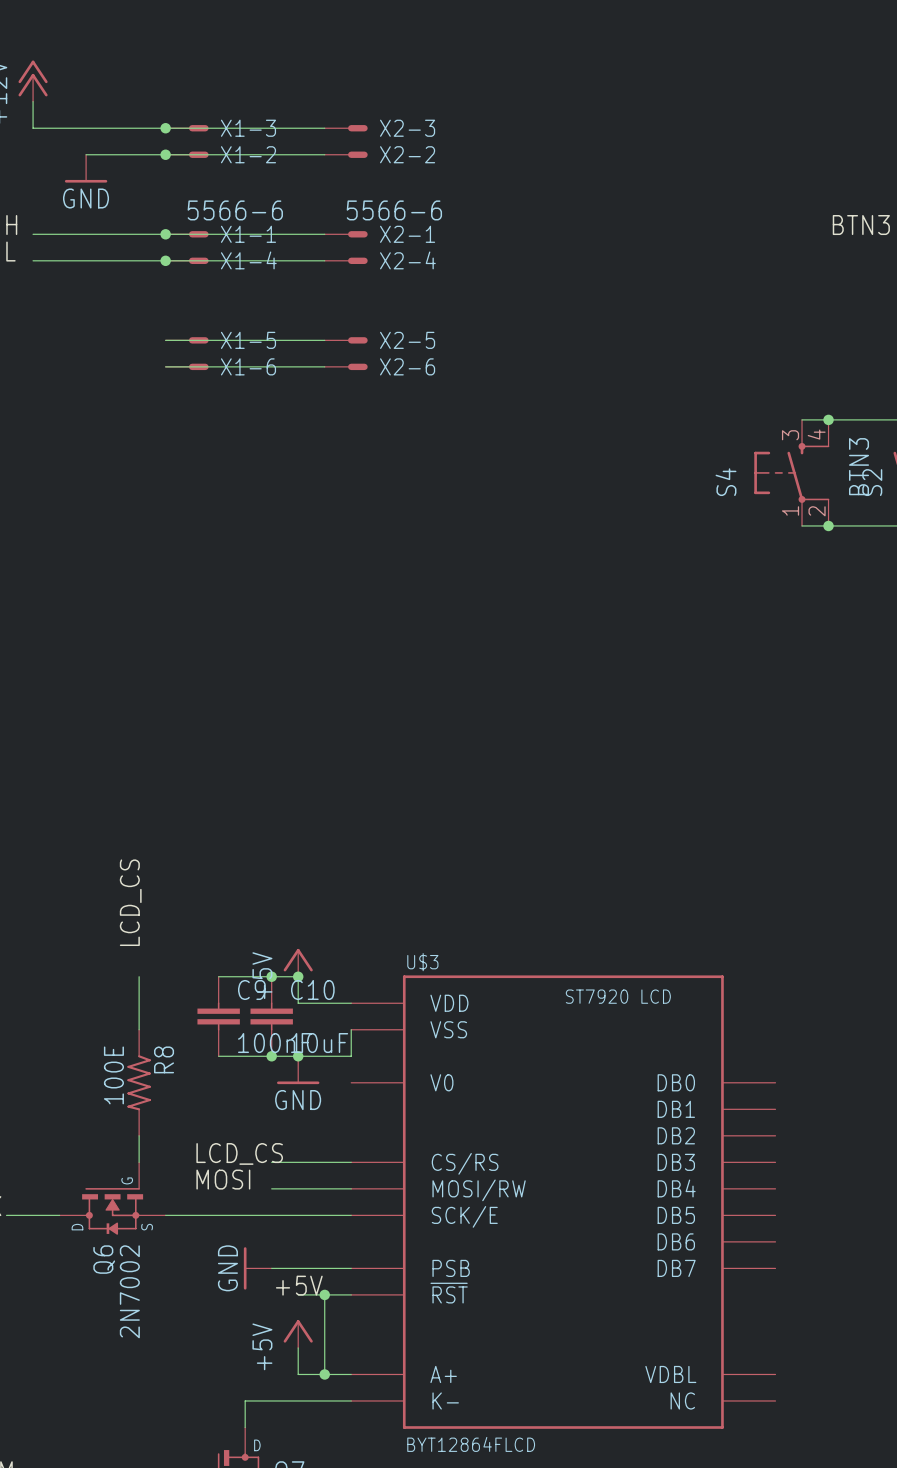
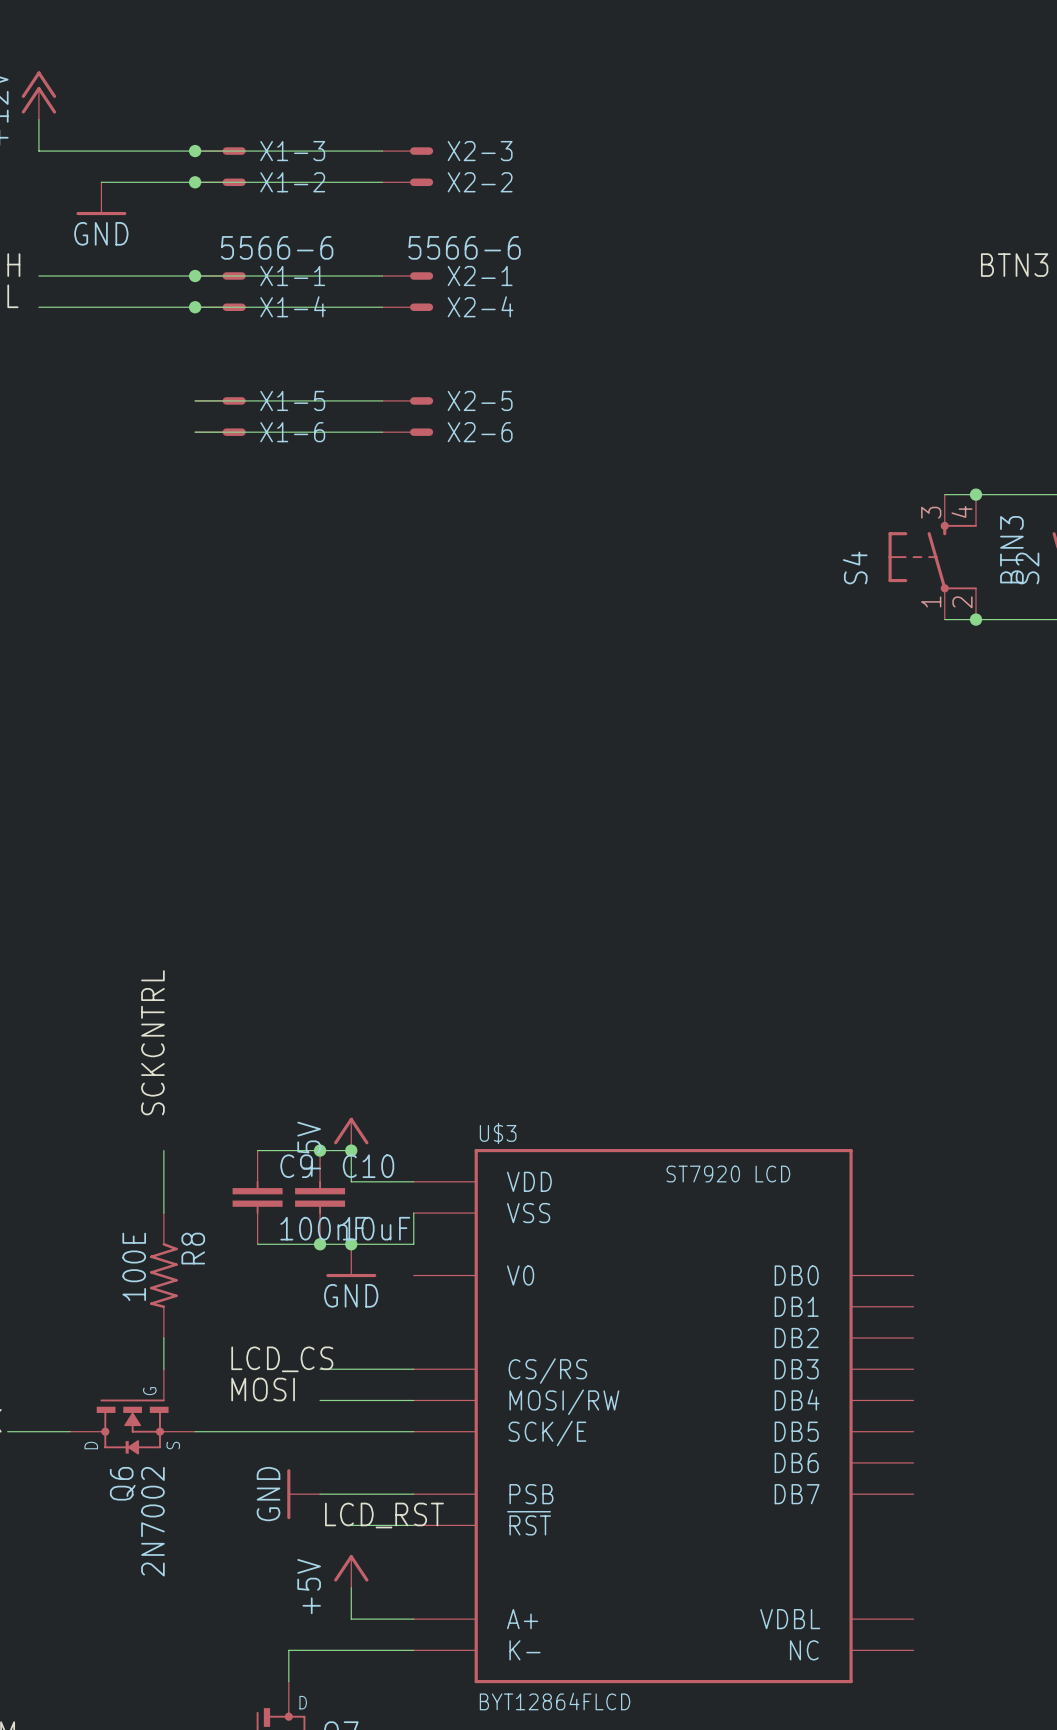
label: LCD_CS (130, 902) -> SCKCNTRL (152, 1042)
label: +5V (299, 1285) -> LCD_RST (384, 1515)
wire: (324, 1294) (324, 1374) -> none
junction: (324, 1294) -> none
junction: (324, 1374) -> none

